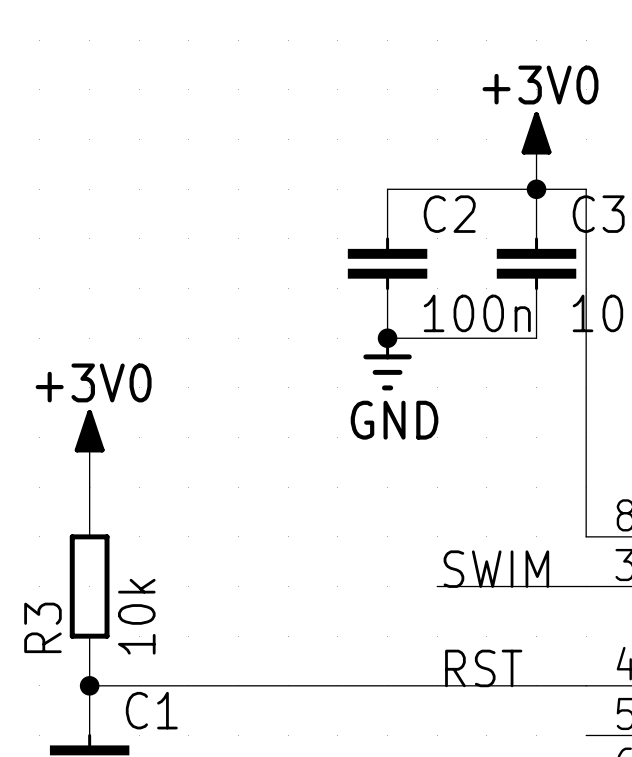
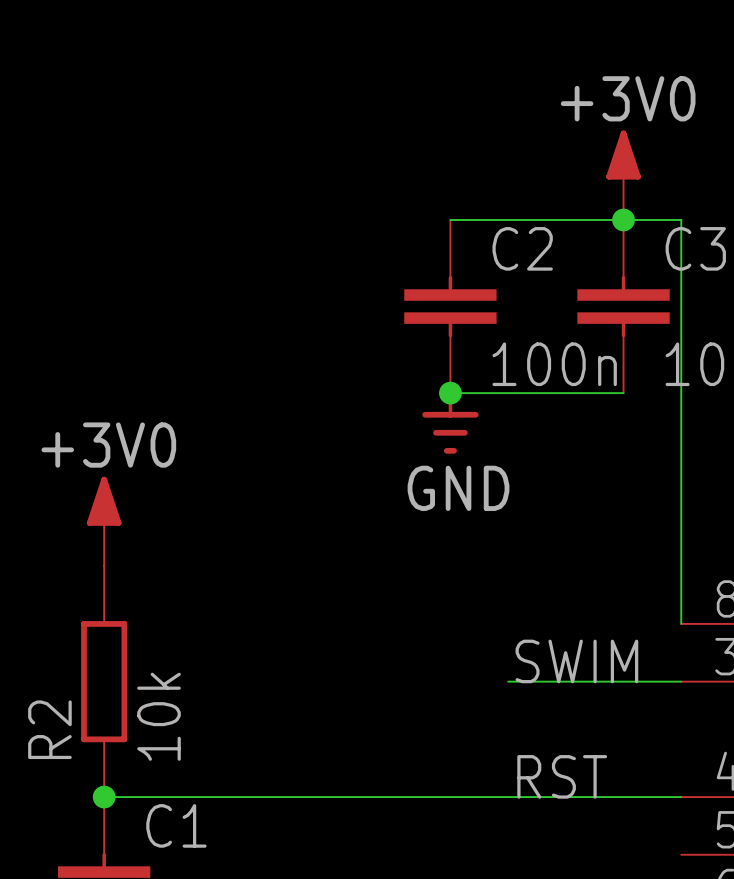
R3 name: R3 (42, 627) -> R2 (49, 729)

